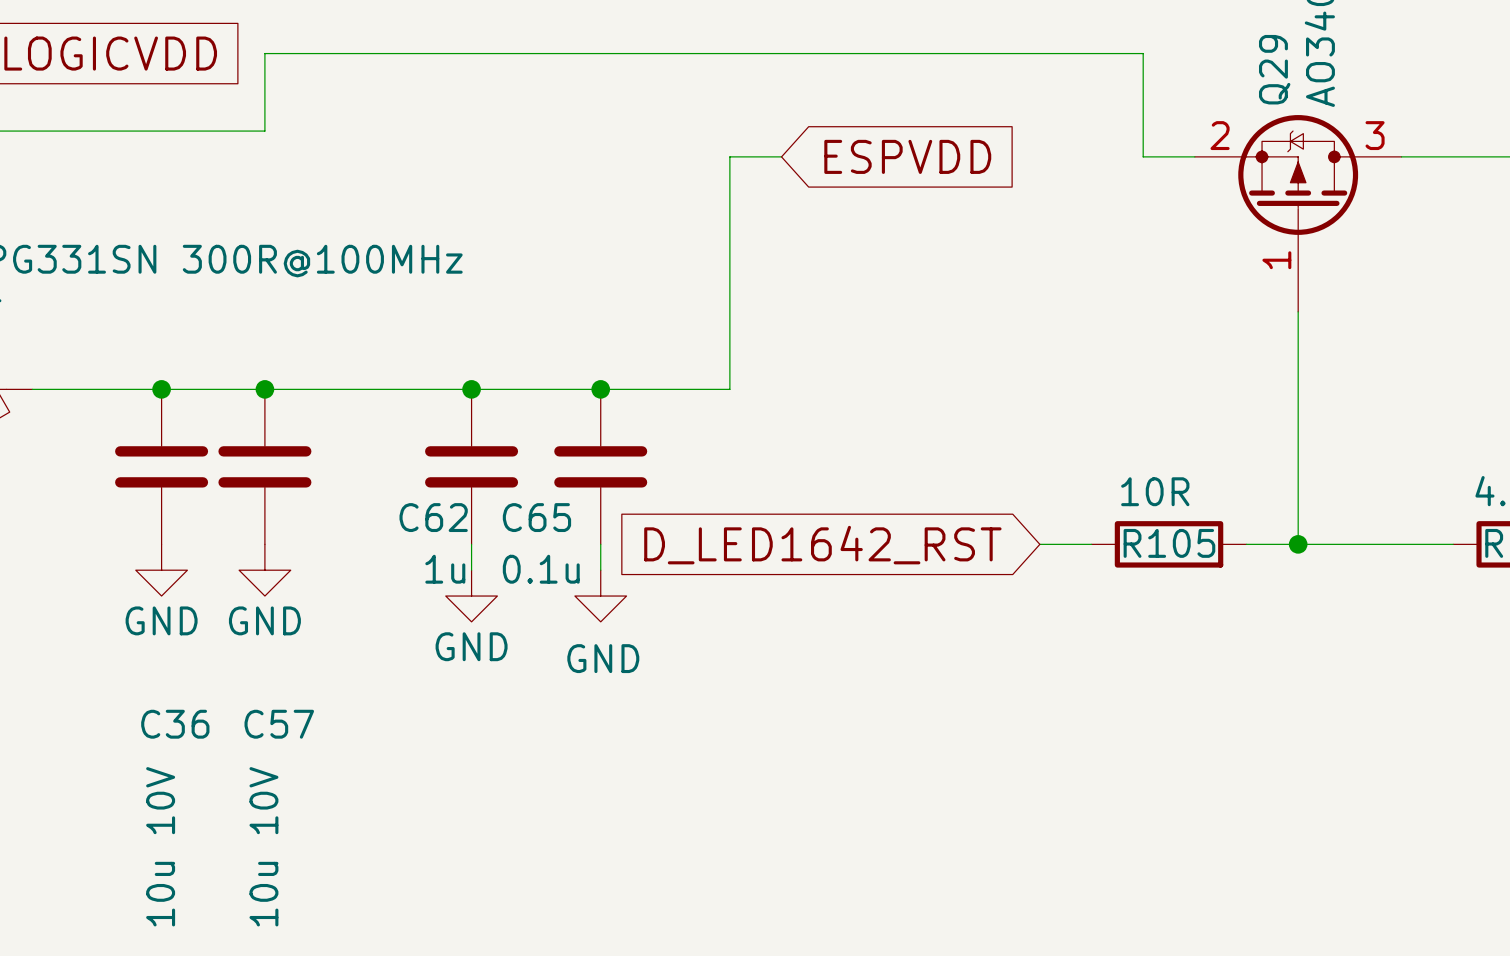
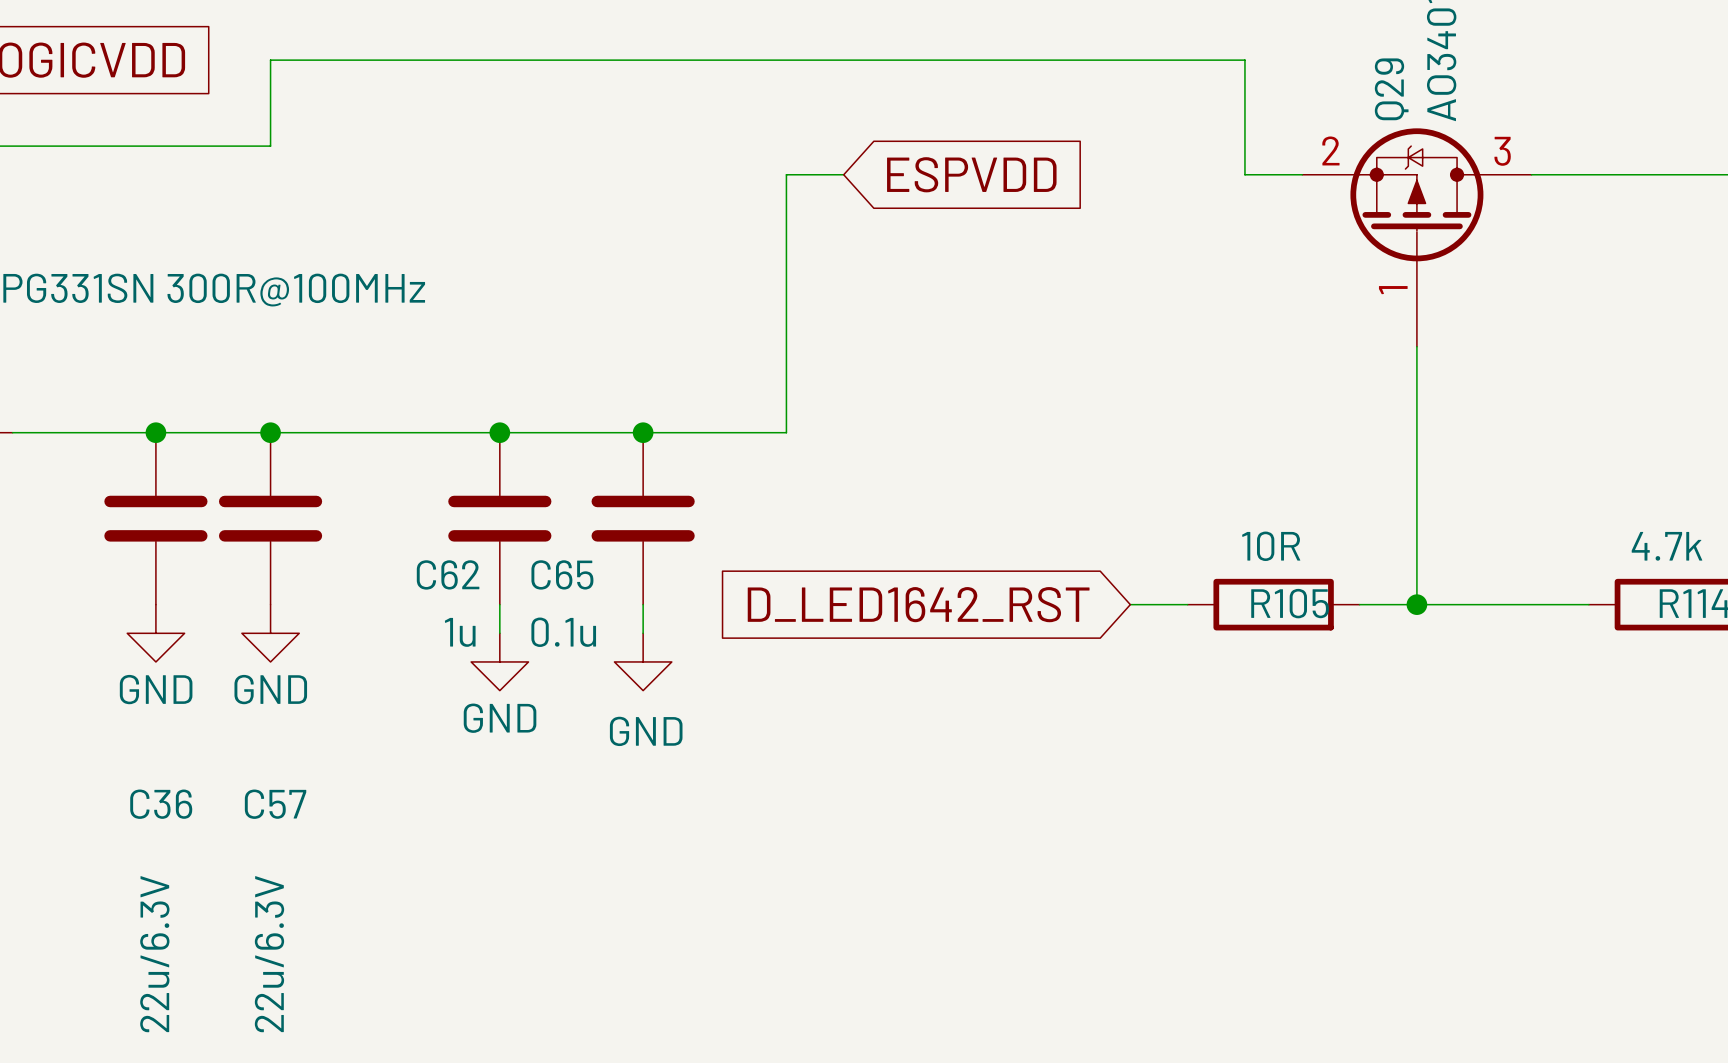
C36 value: 10u 10V (160, 846) -> 22u/6.3V (154, 954)
C57 value: 10u 10V (263, 846) -> 22u/6.3V (269, 954)

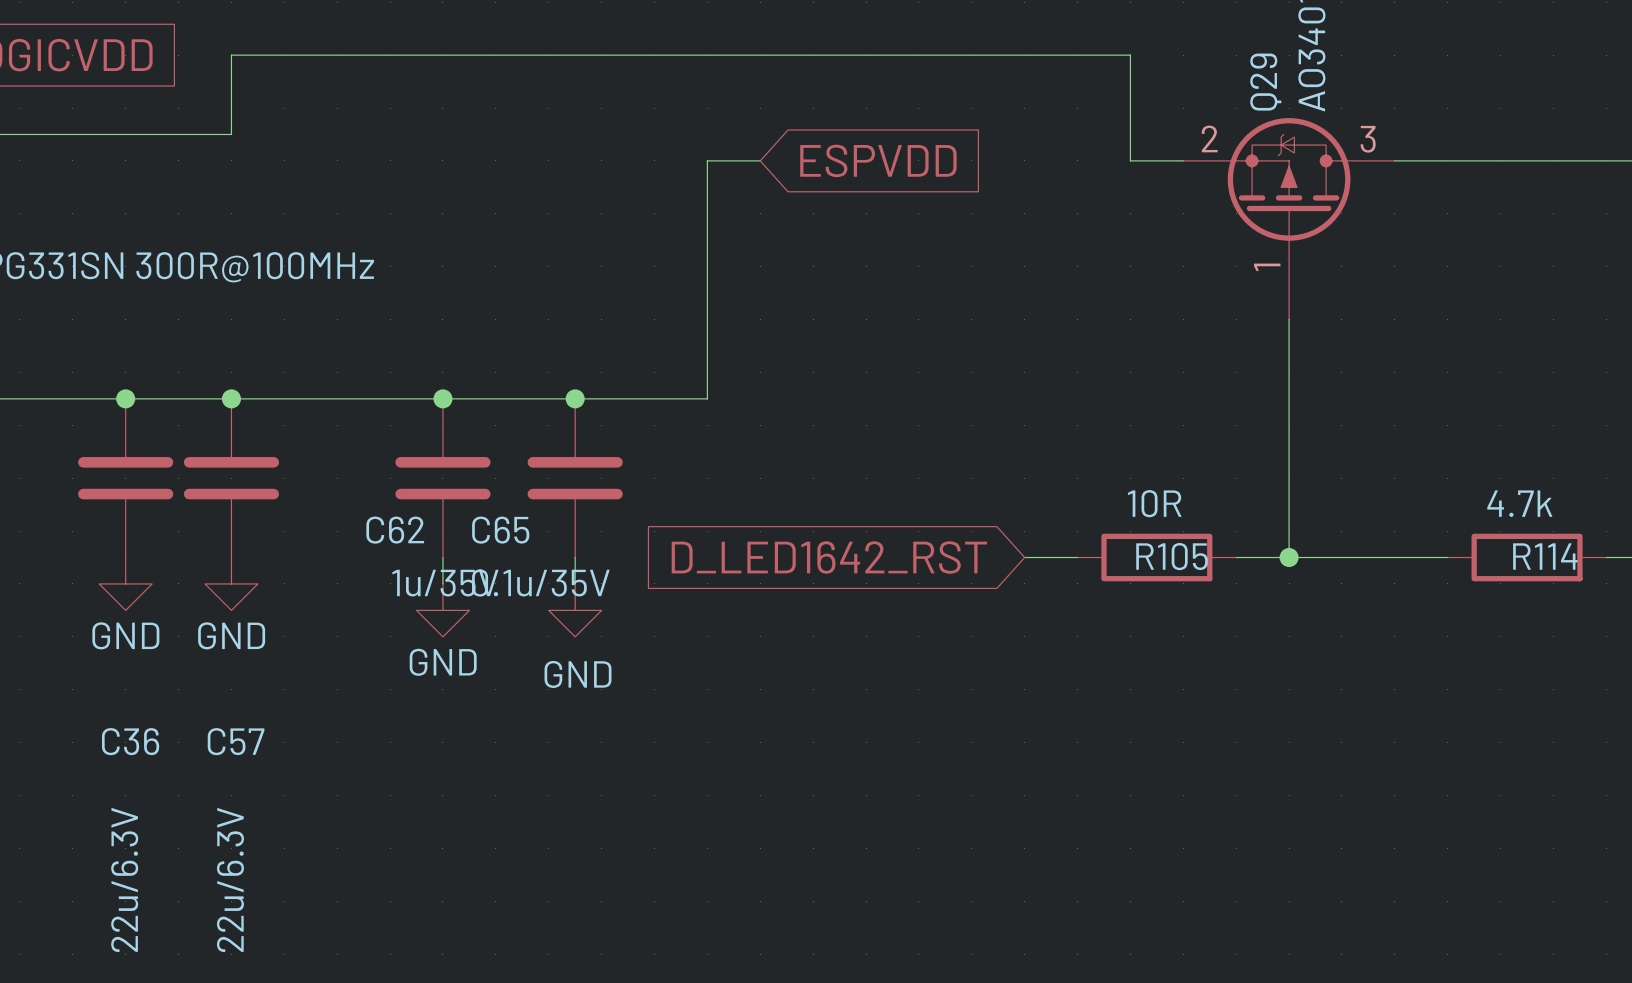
C62 value: 1u (460, 632) -> 1u/35V (445, 583)
C65 value: 0.1u (563, 632) -> 0.1u/35V (540, 582)

